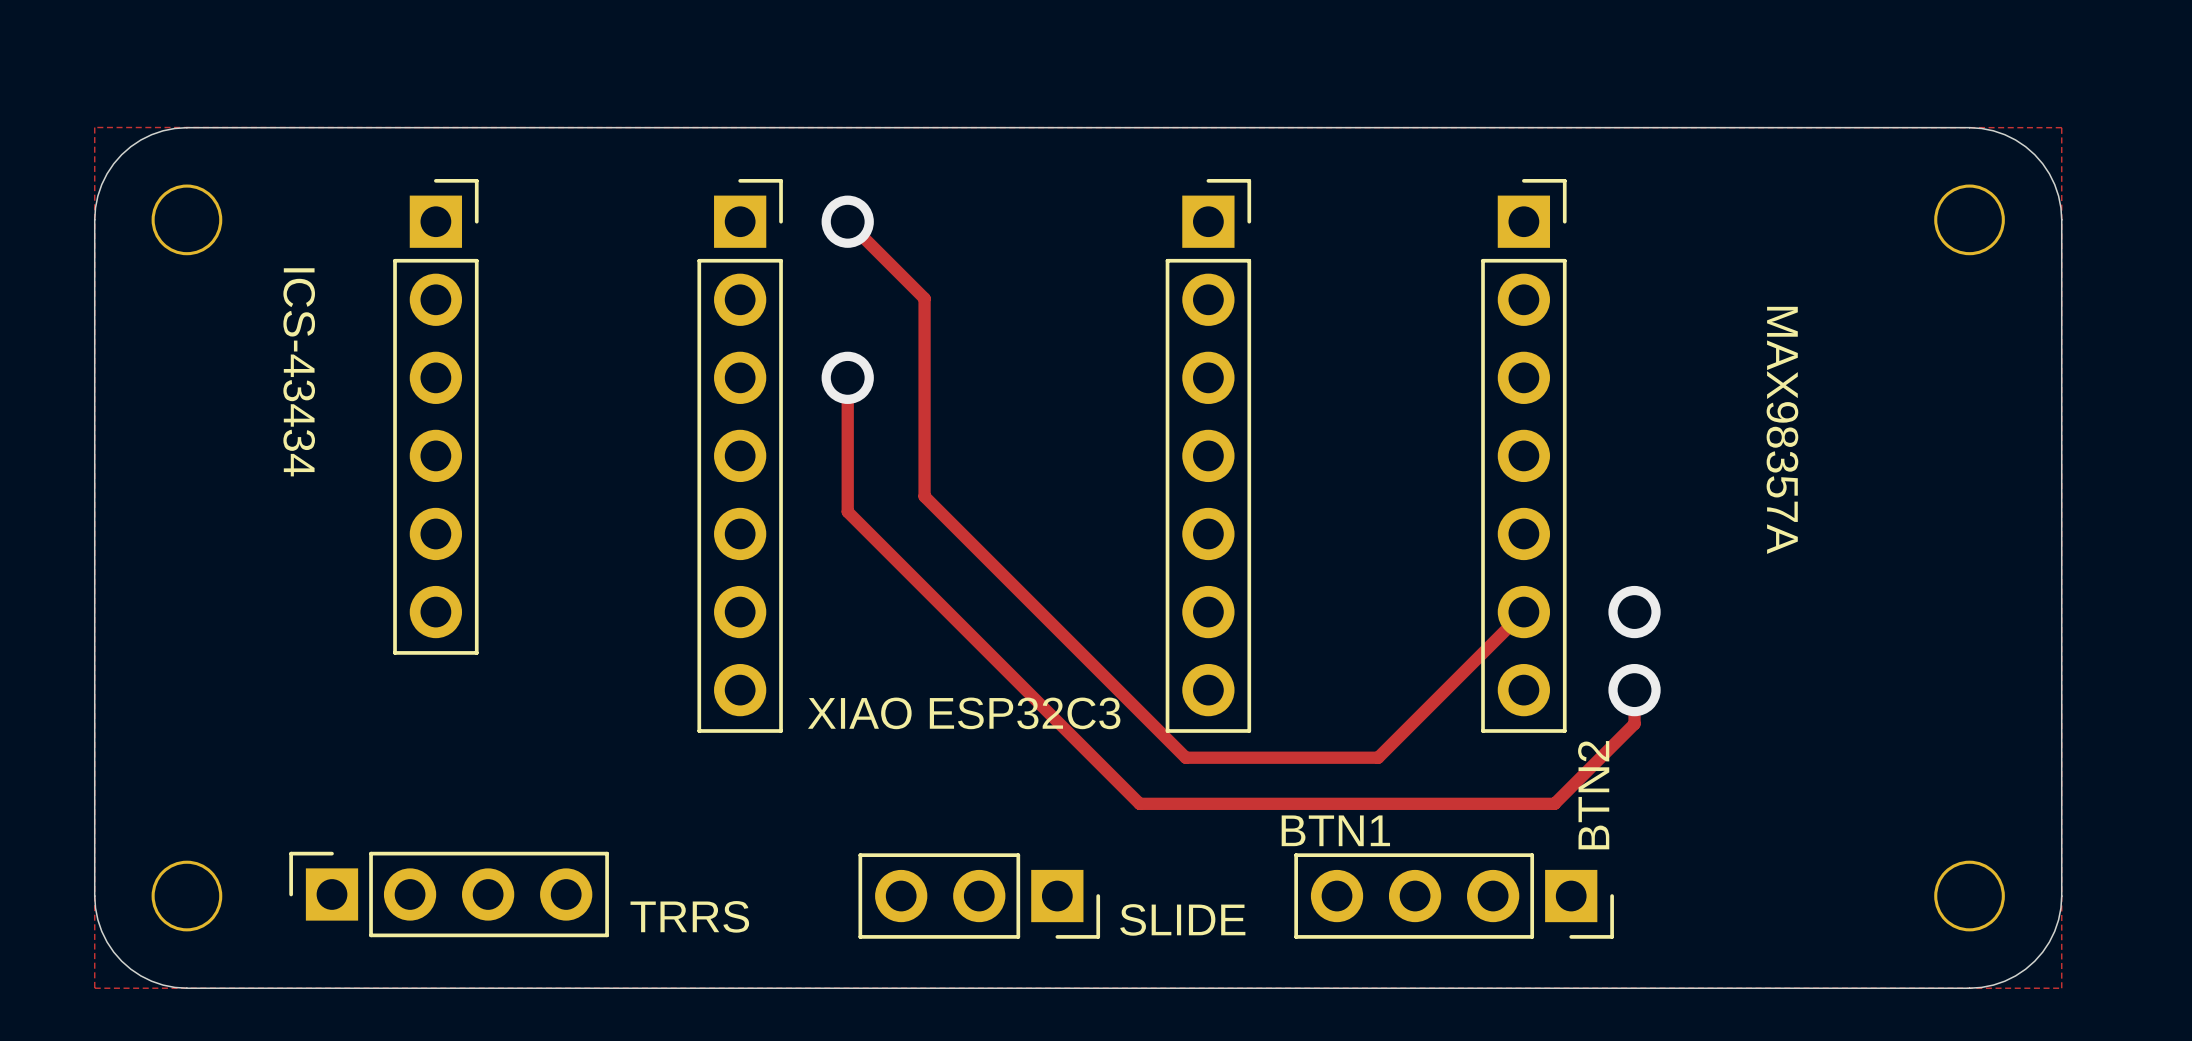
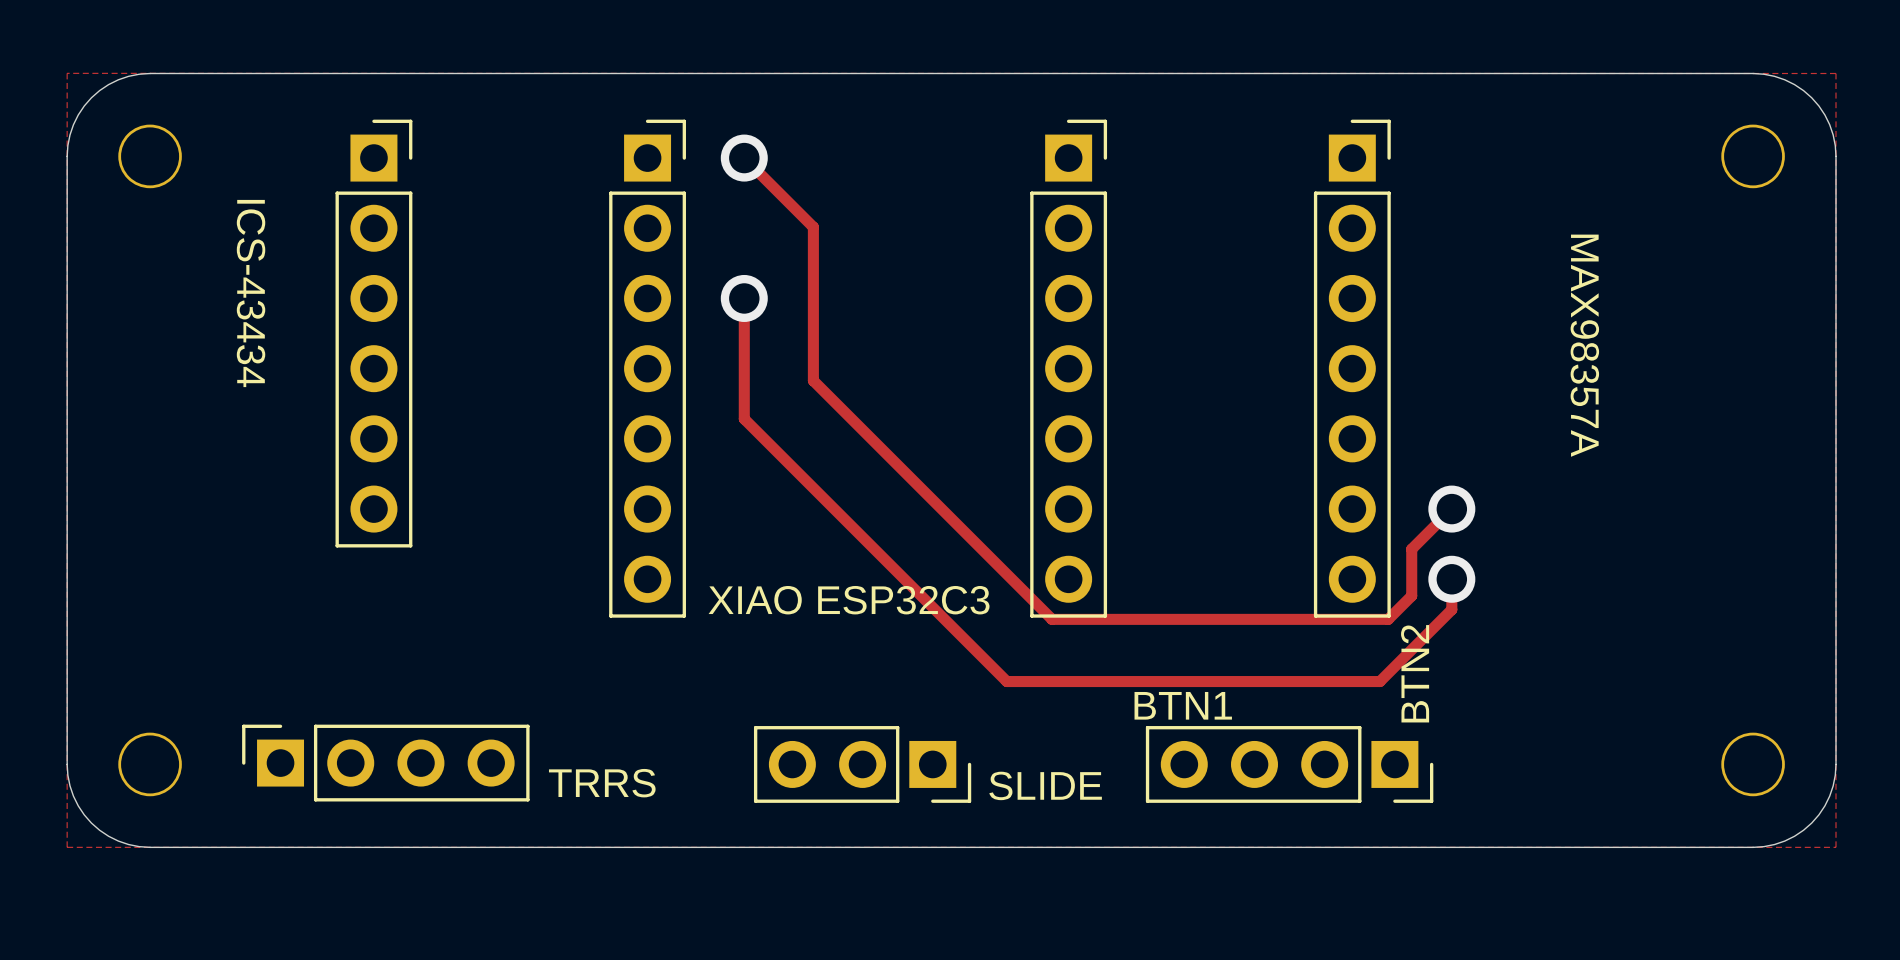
track: (924, 469) (924, 496) (1185, 757) (1378, 757) (1523, 612) -> (813, 380) (1052, 619) (1388, 619) (1411, 595) (1411, 549) (1451, 509)

